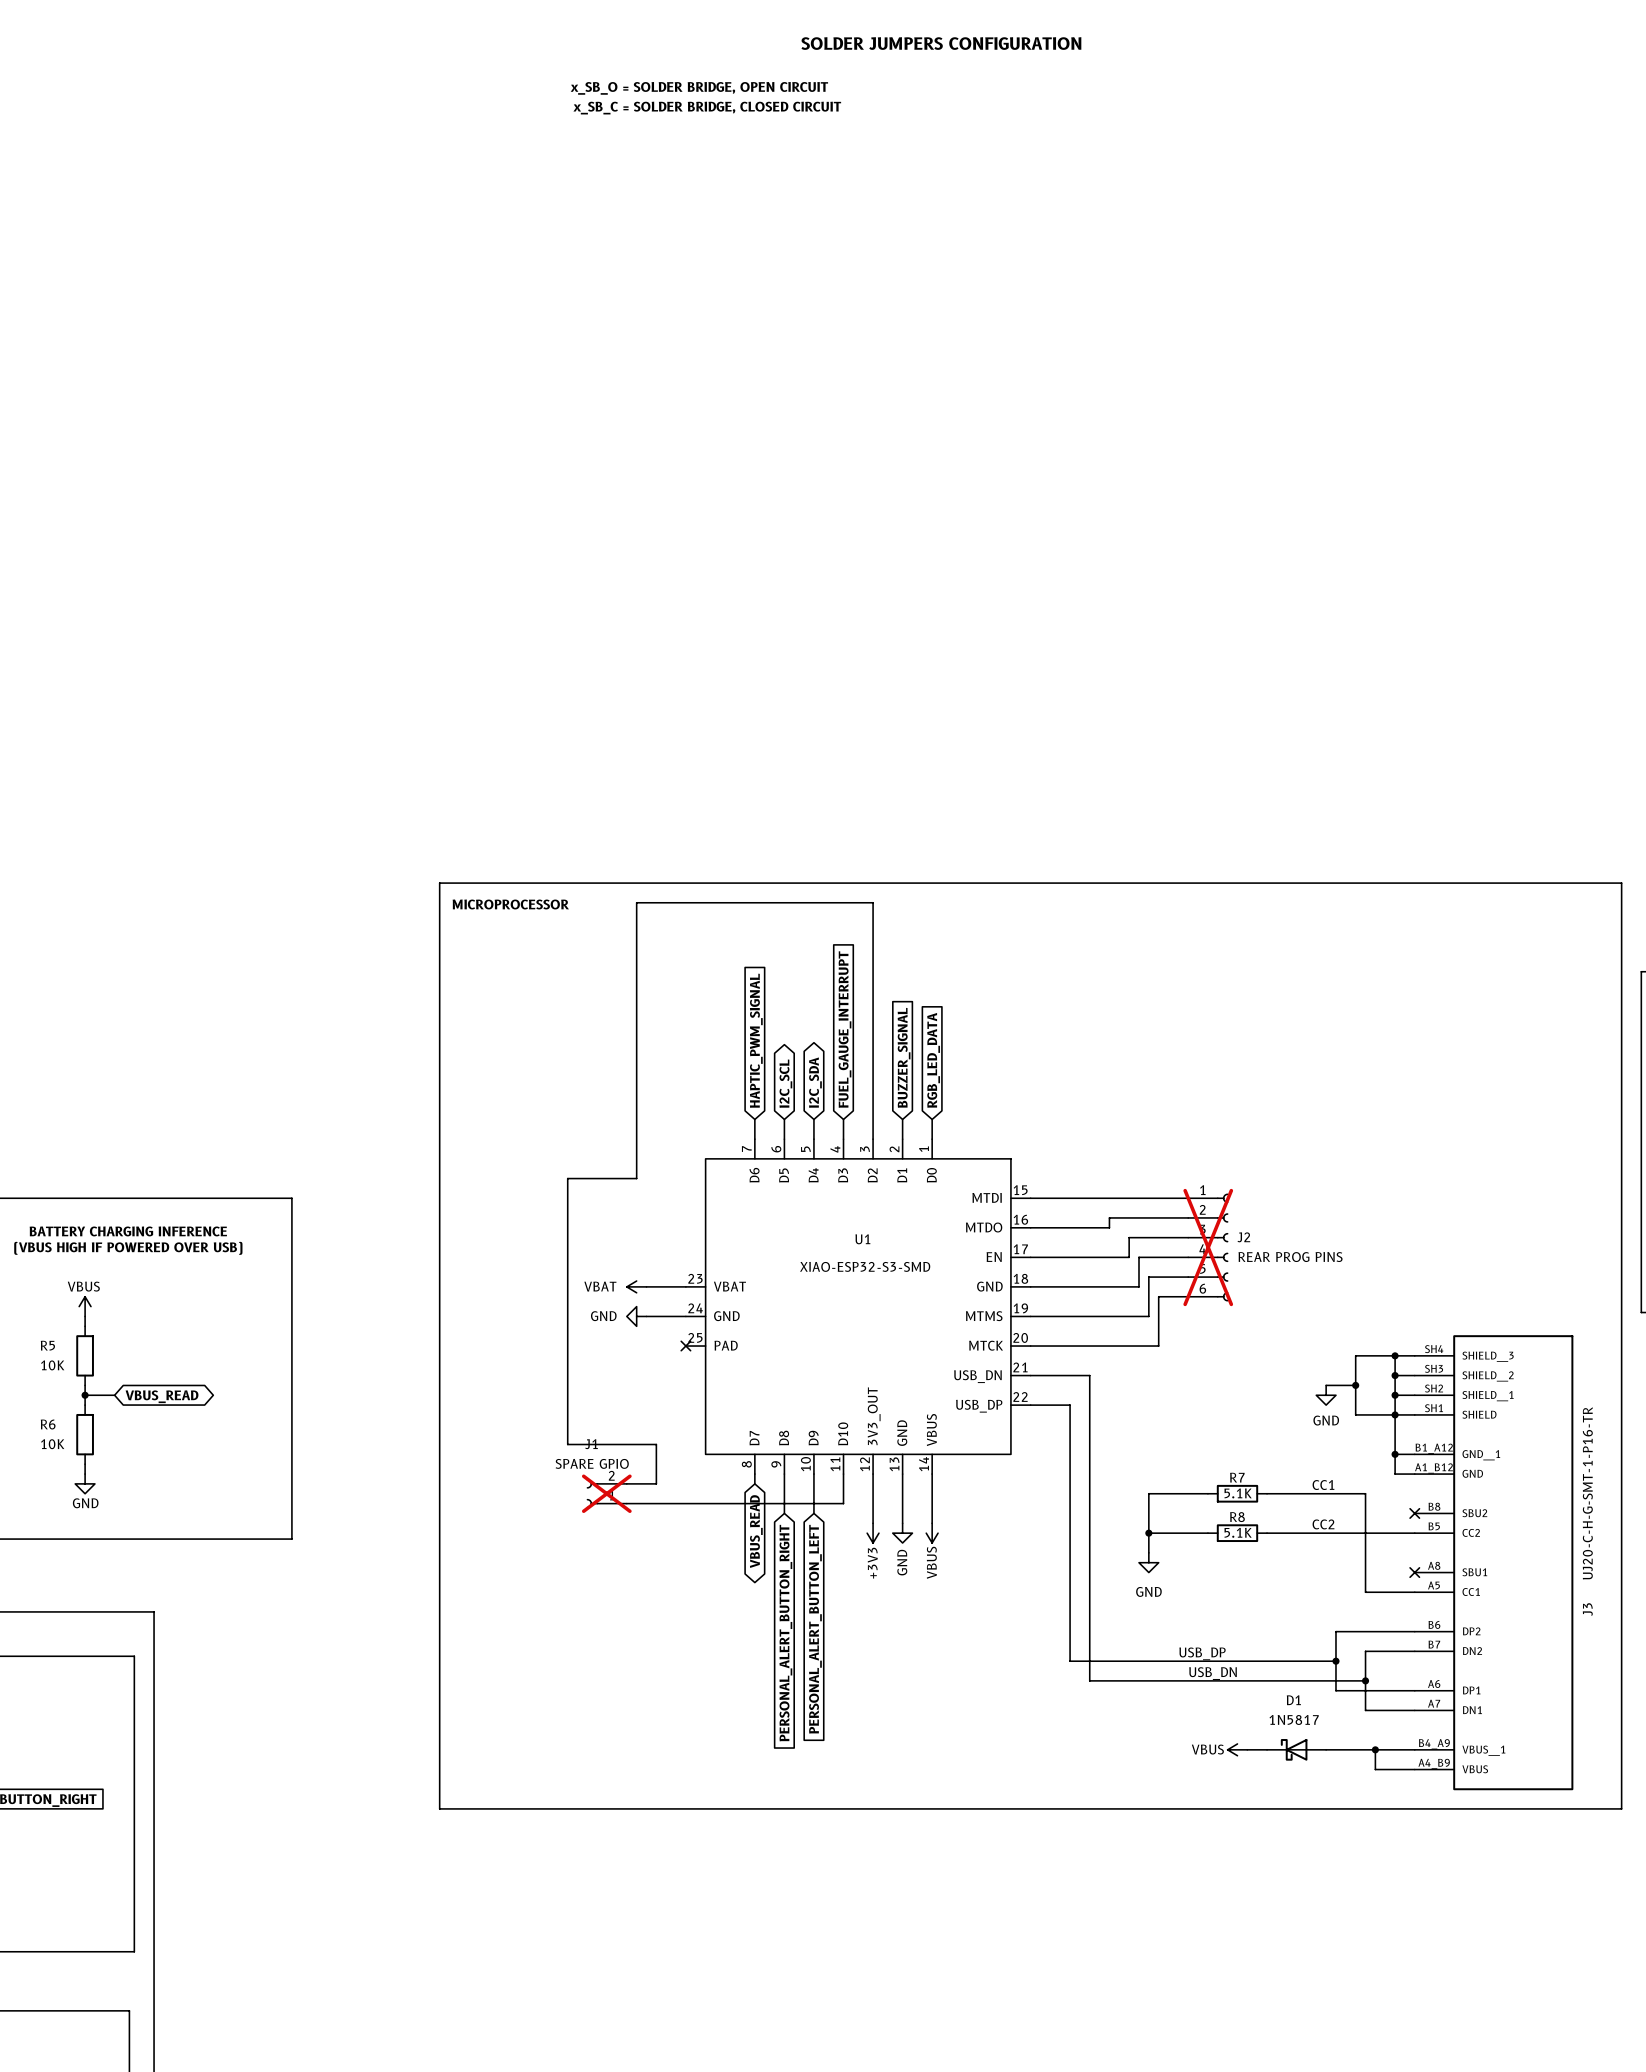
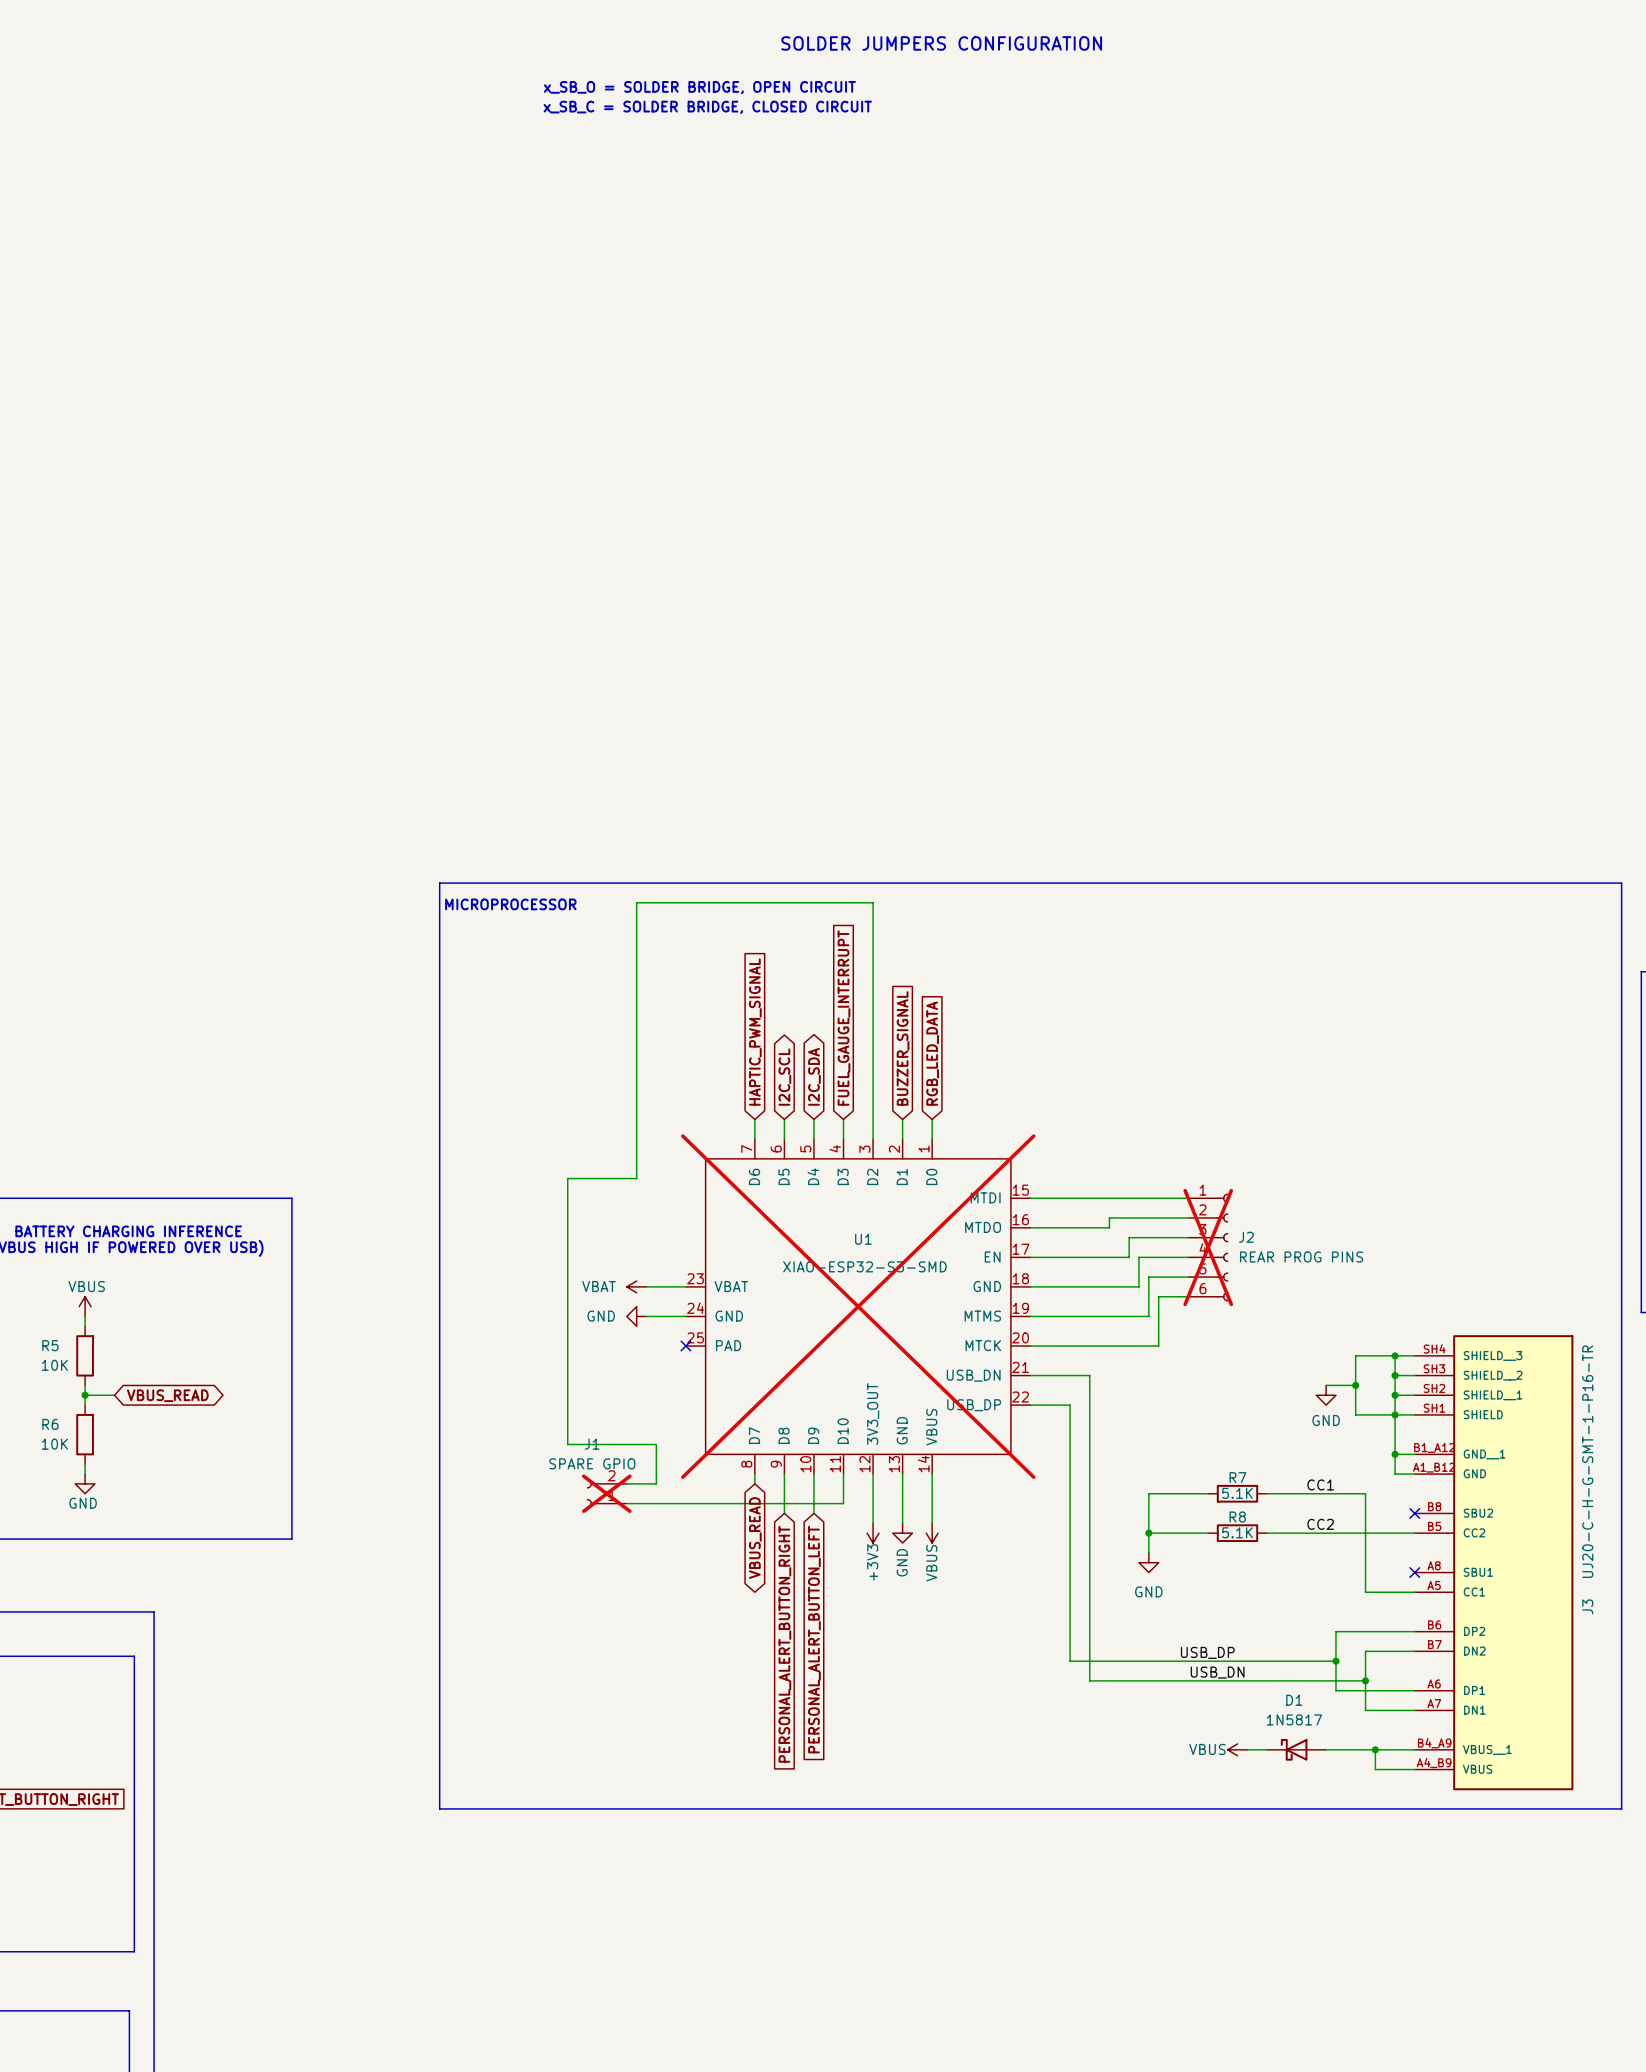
U1 do-not-place cross: none -> (858, 1306)

